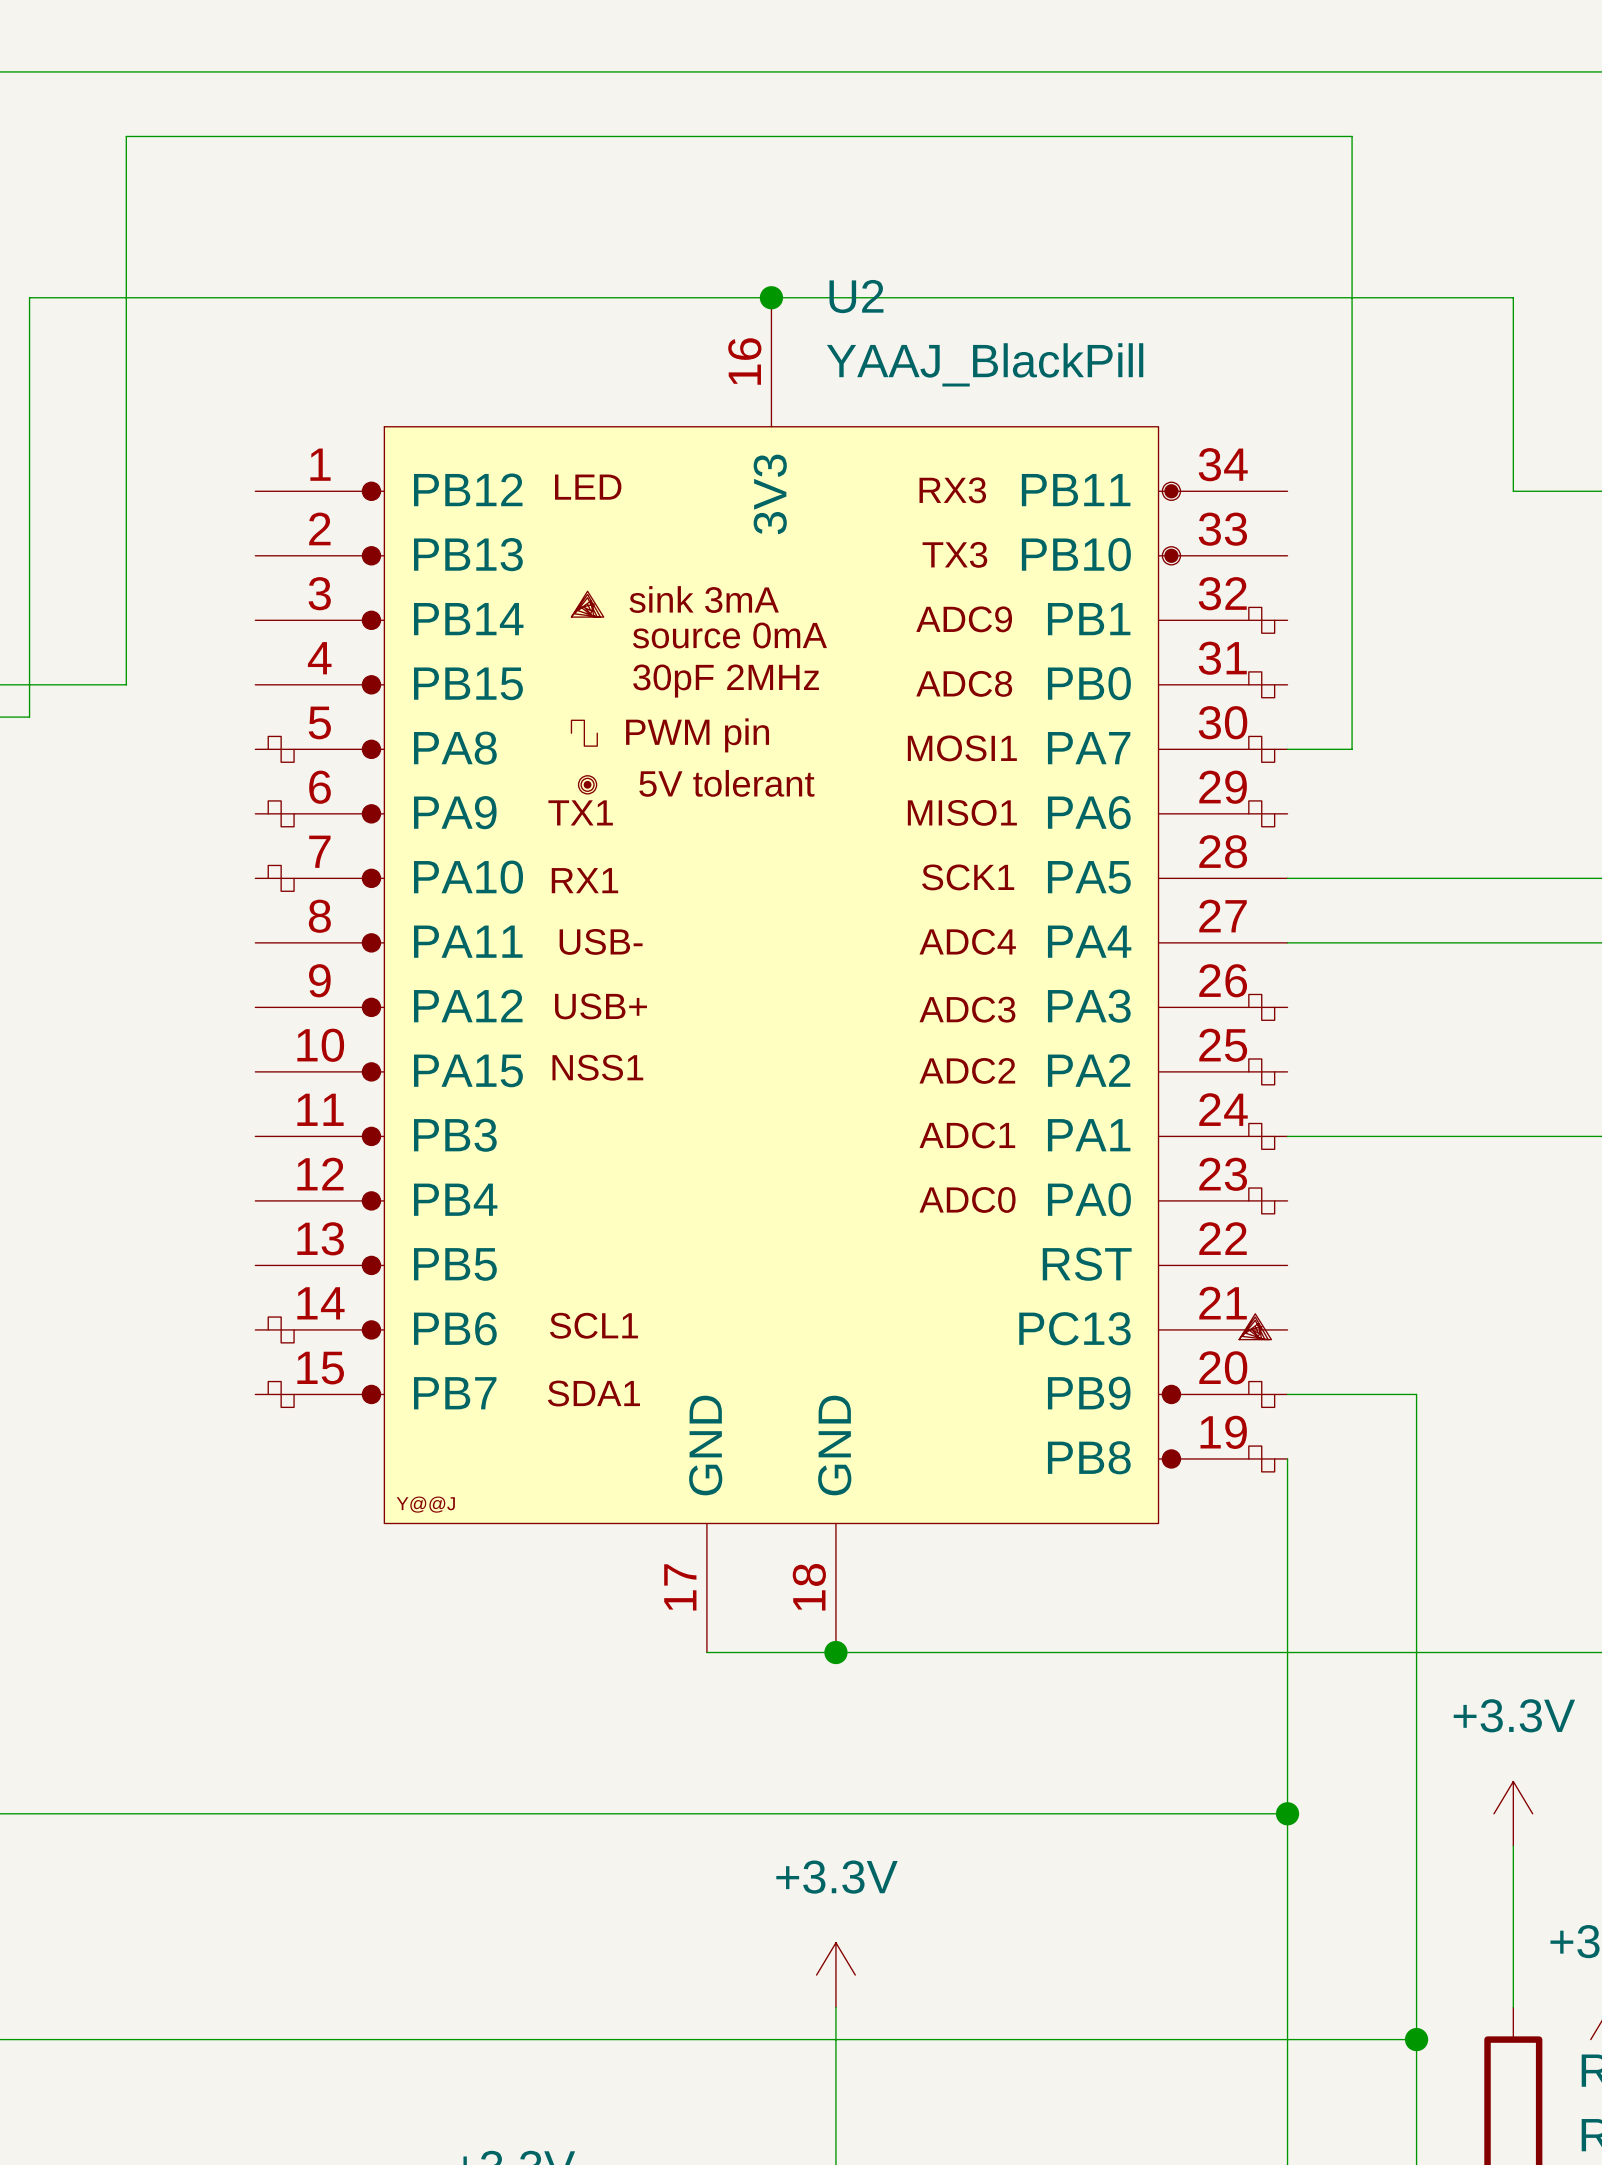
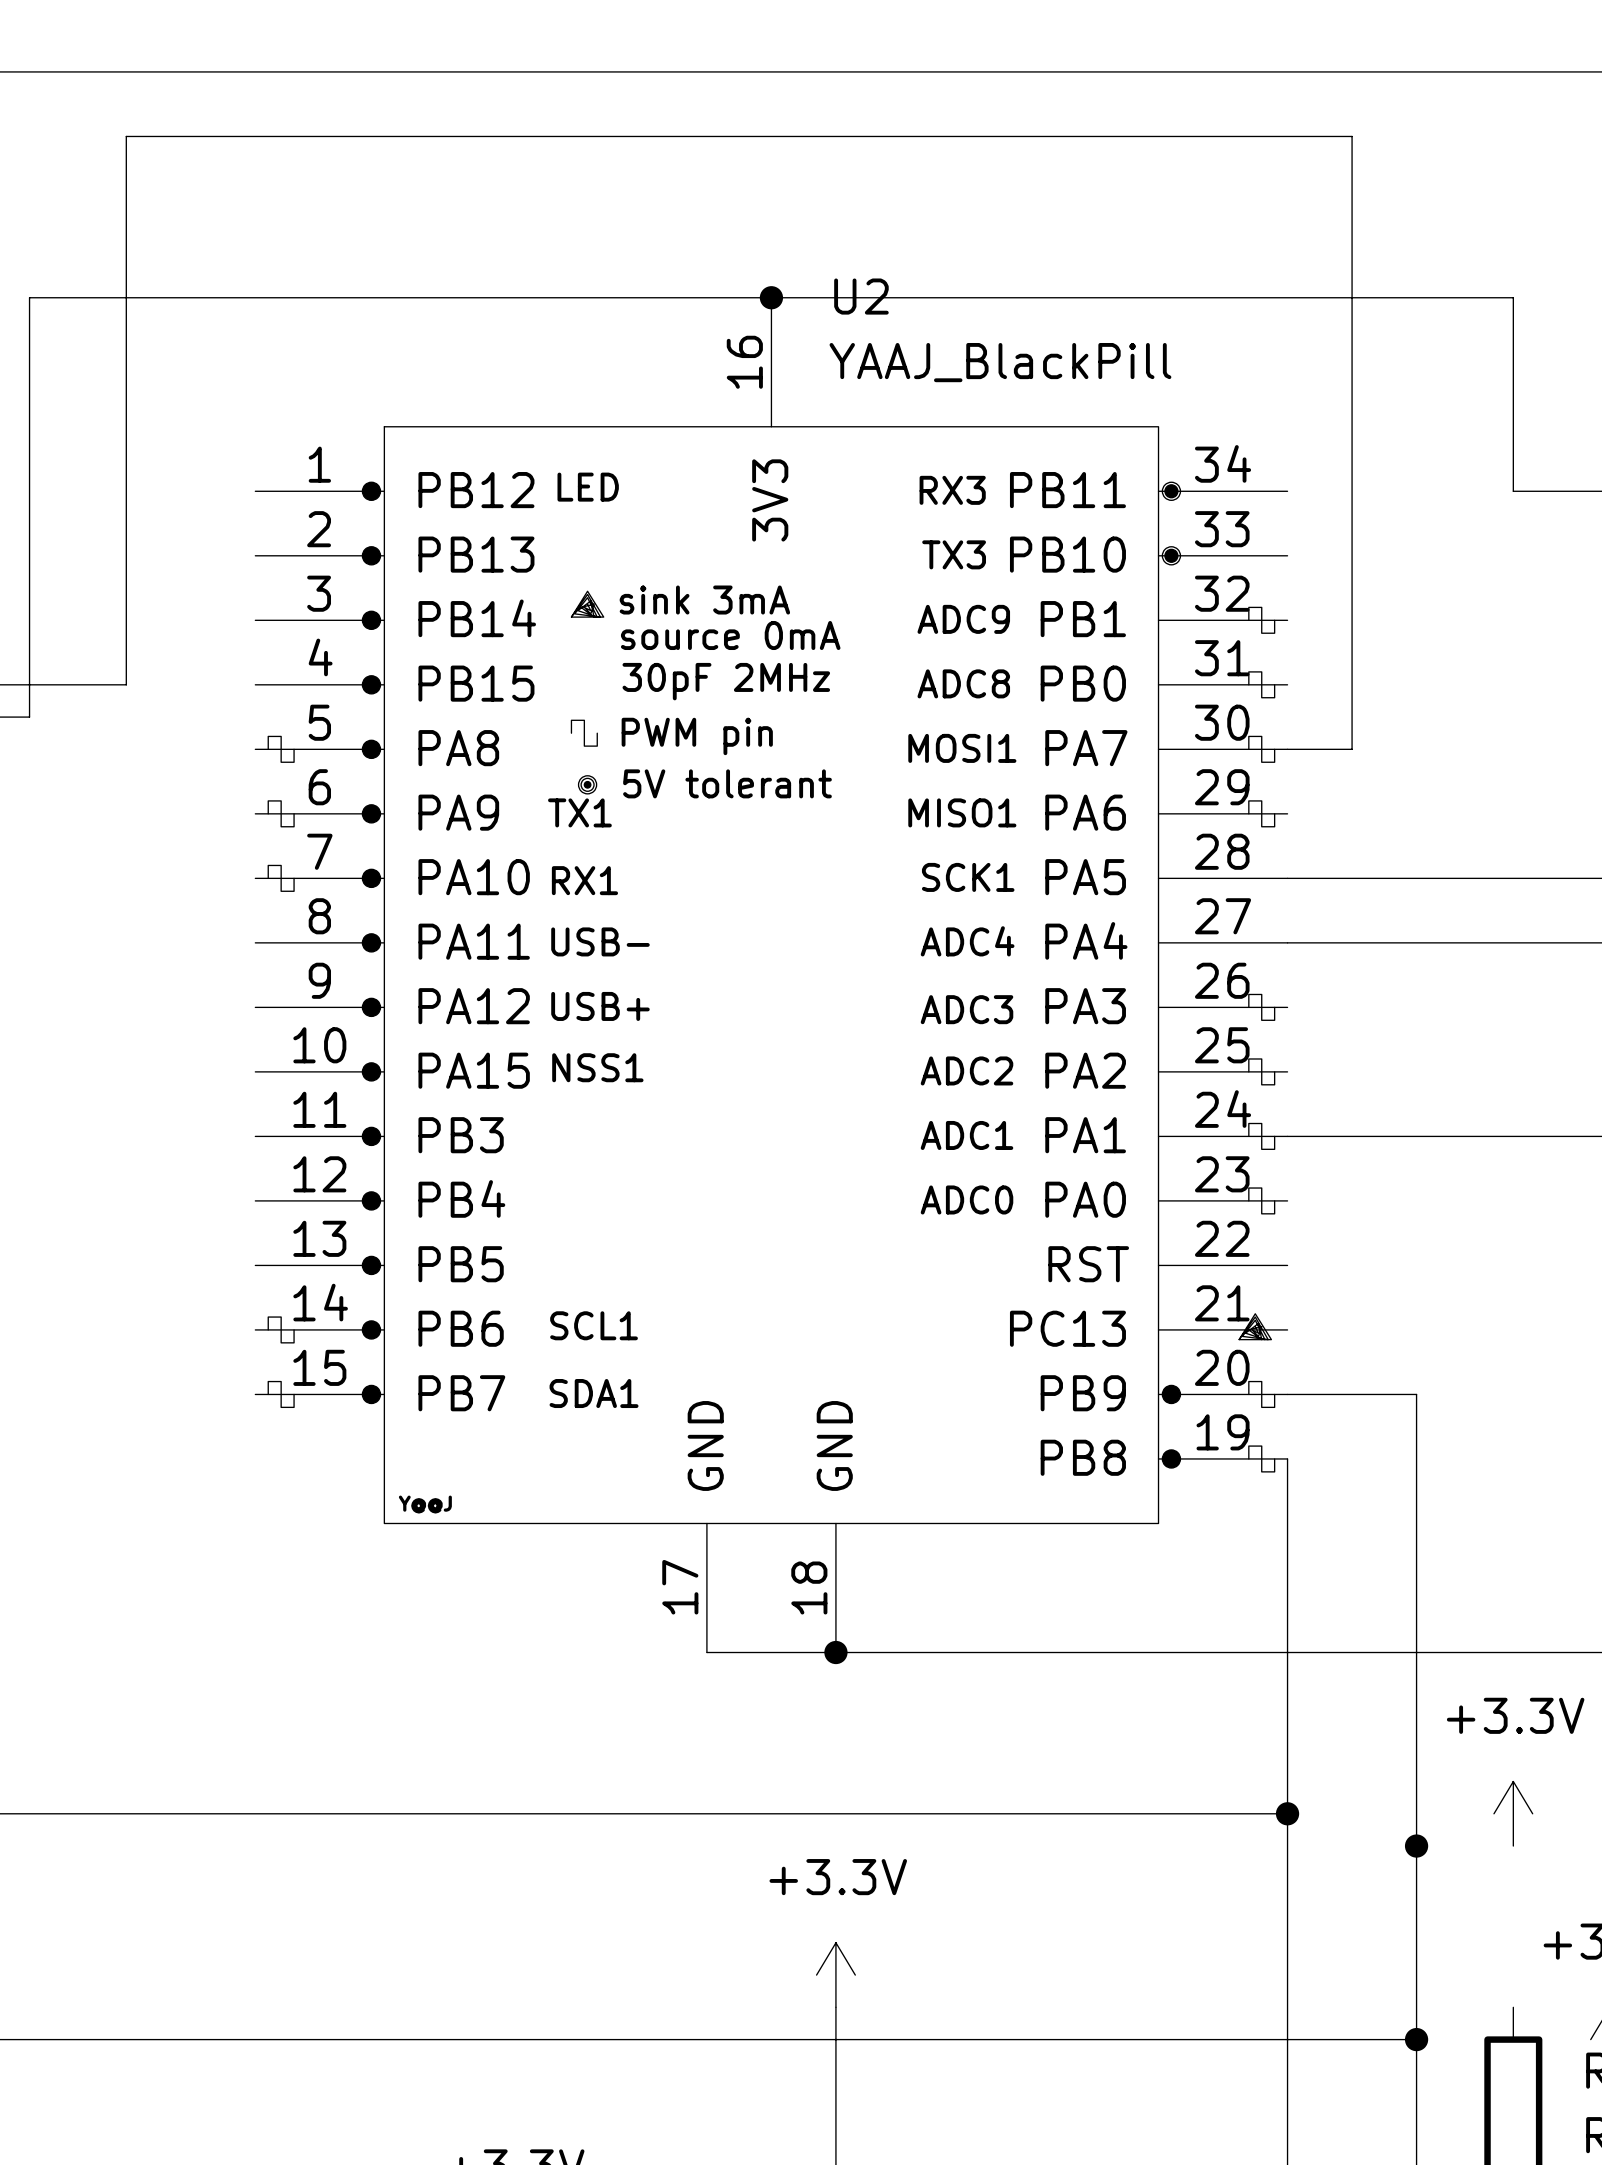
junction: none -> (1416, 1846)
wire: (1513, 1846) (1513, 2007) -> none

